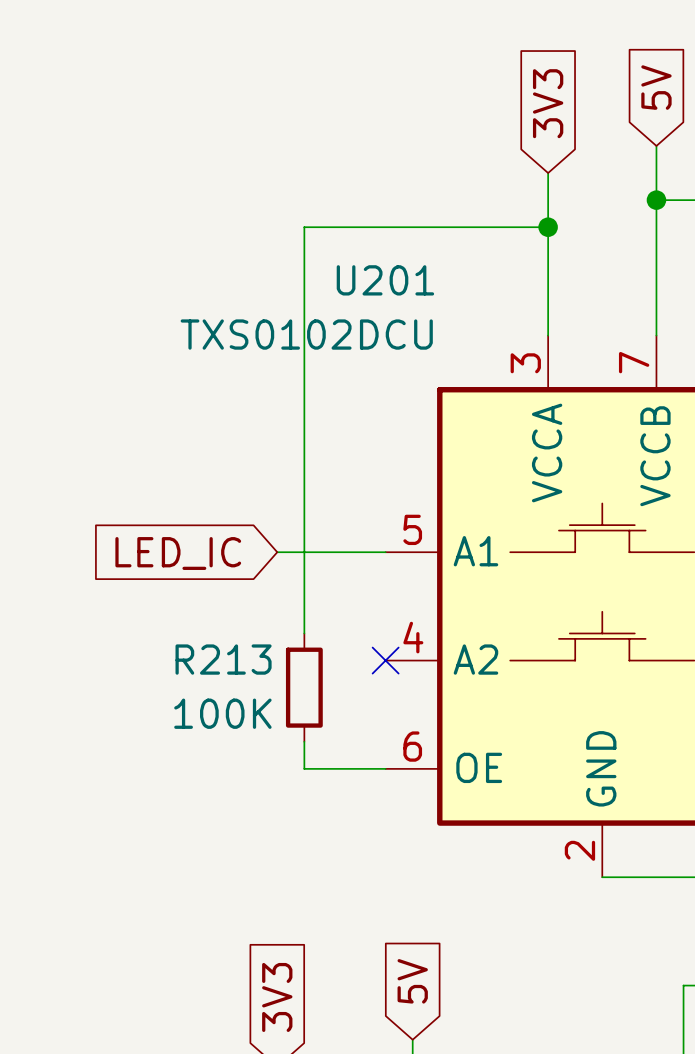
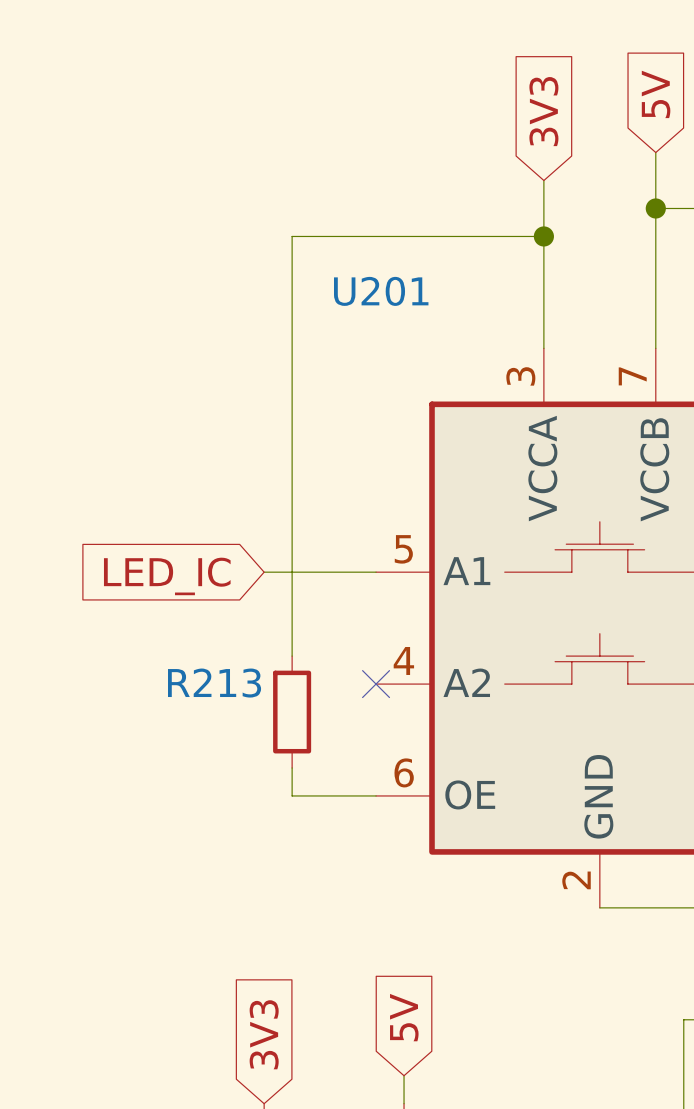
U201 value: TXS0102DCU (306, 334) -> none
R213 value: 100K (222, 713) -> none

